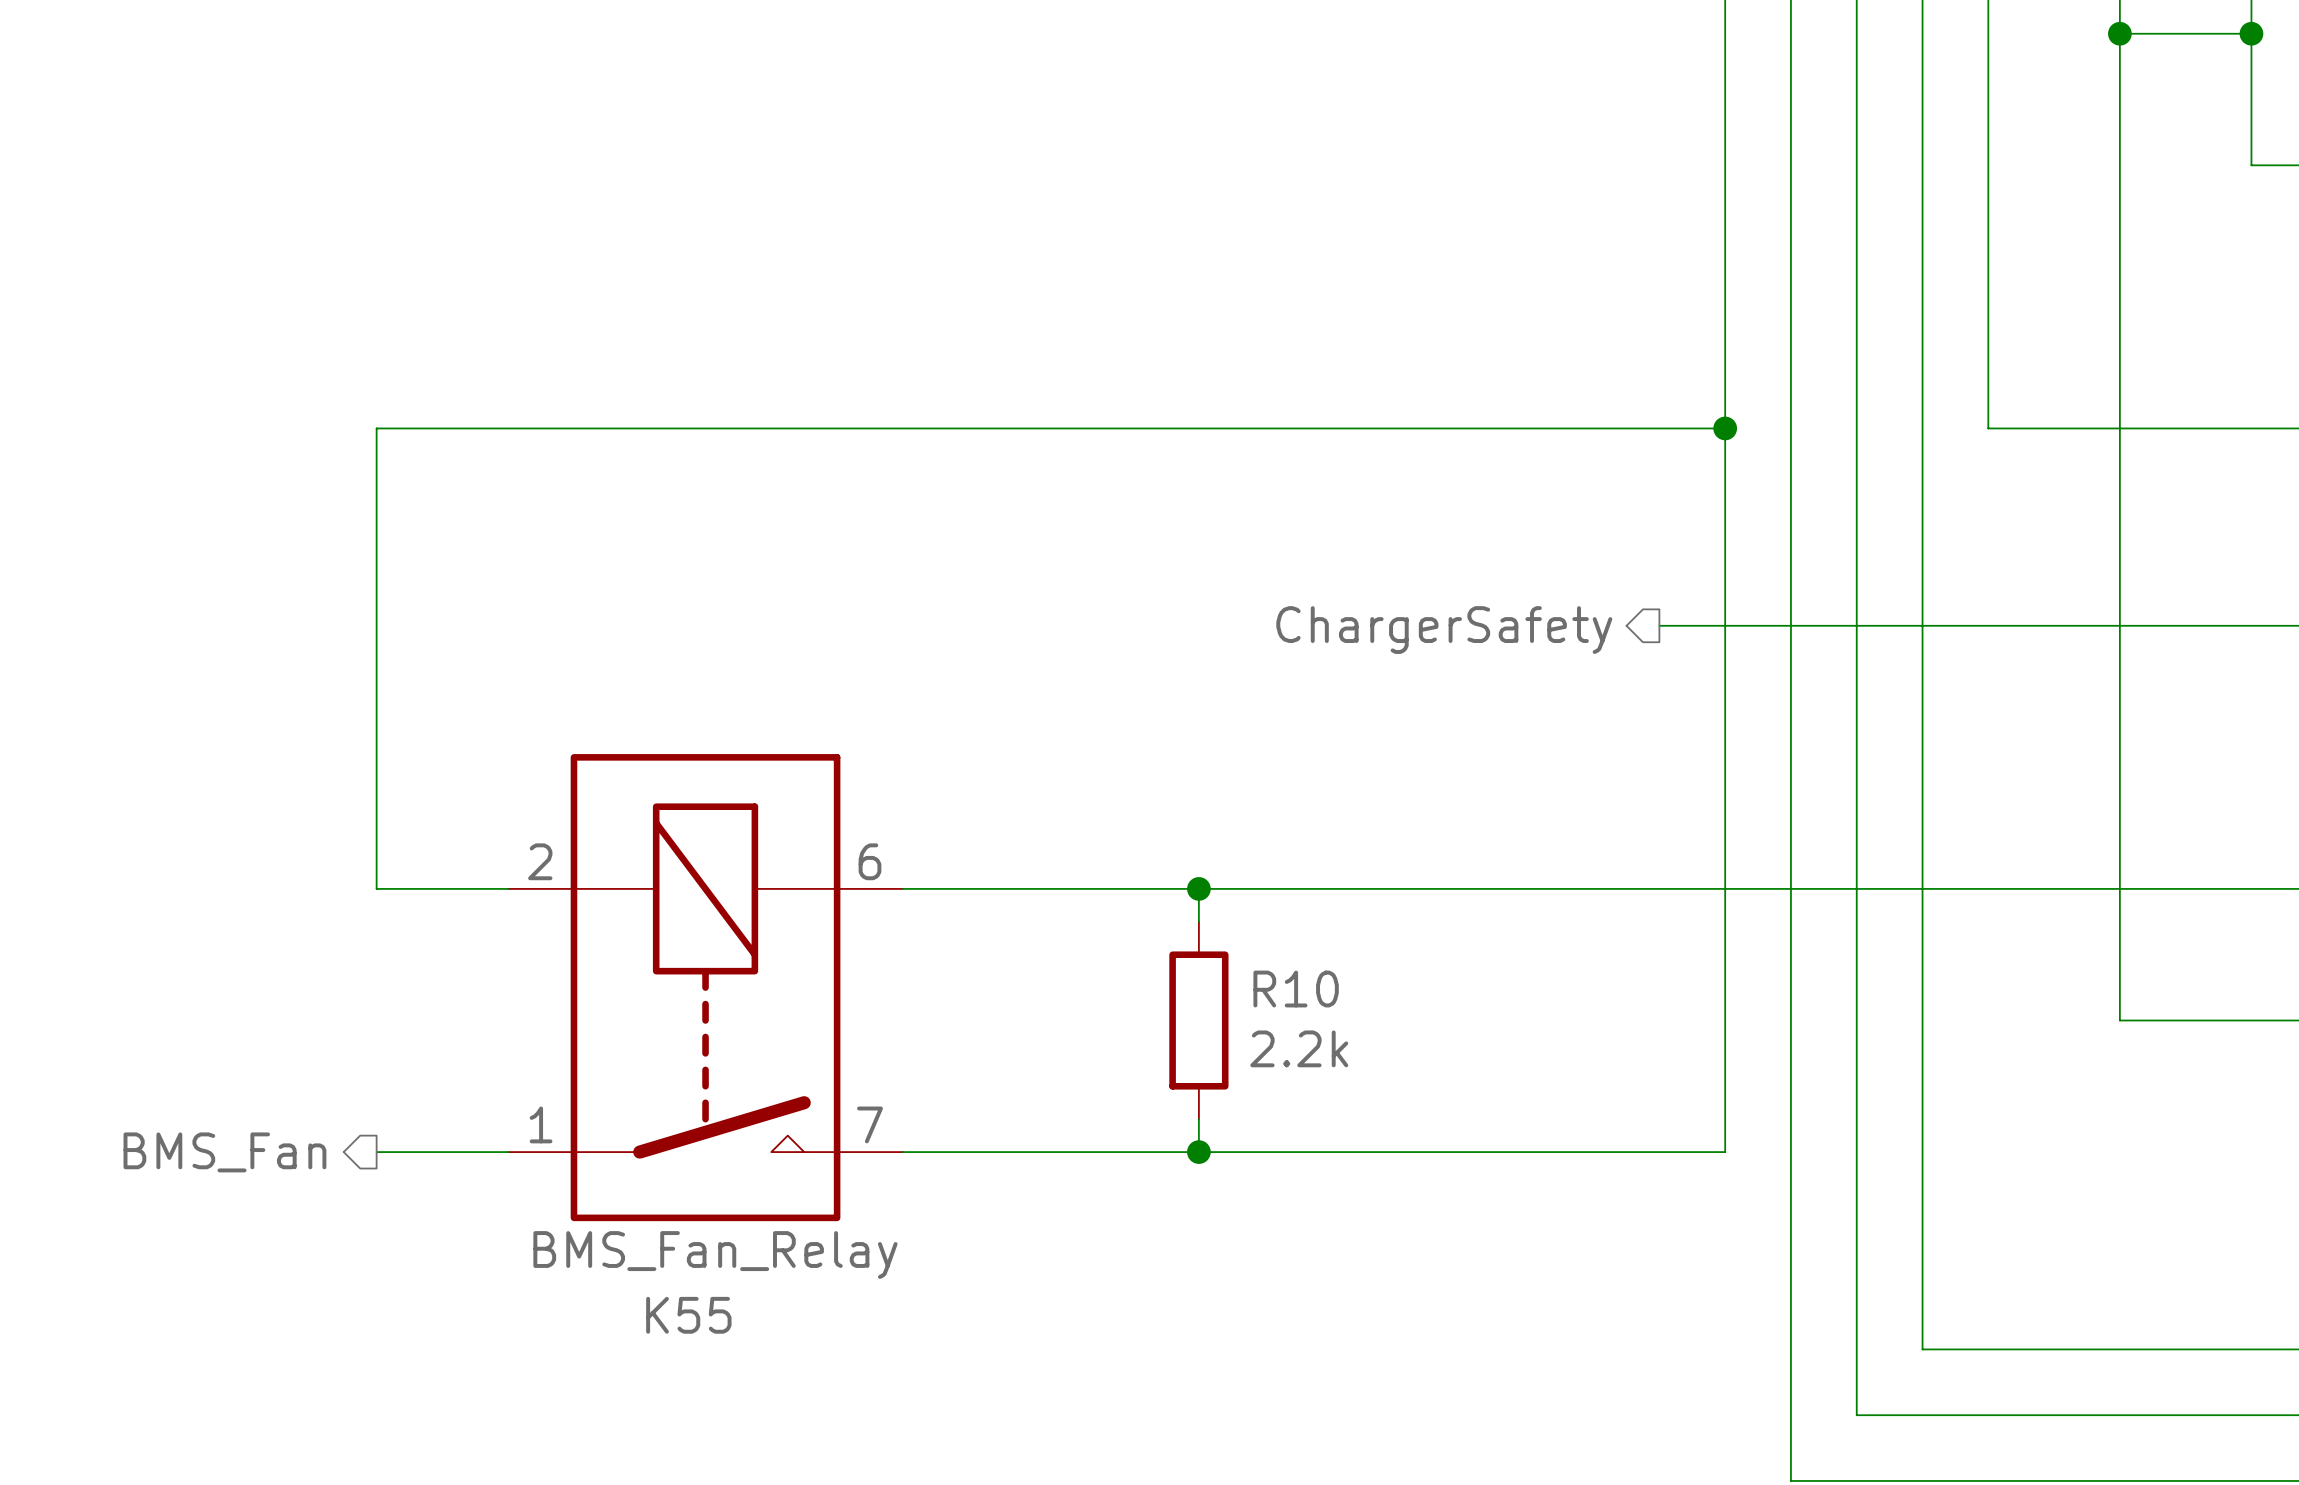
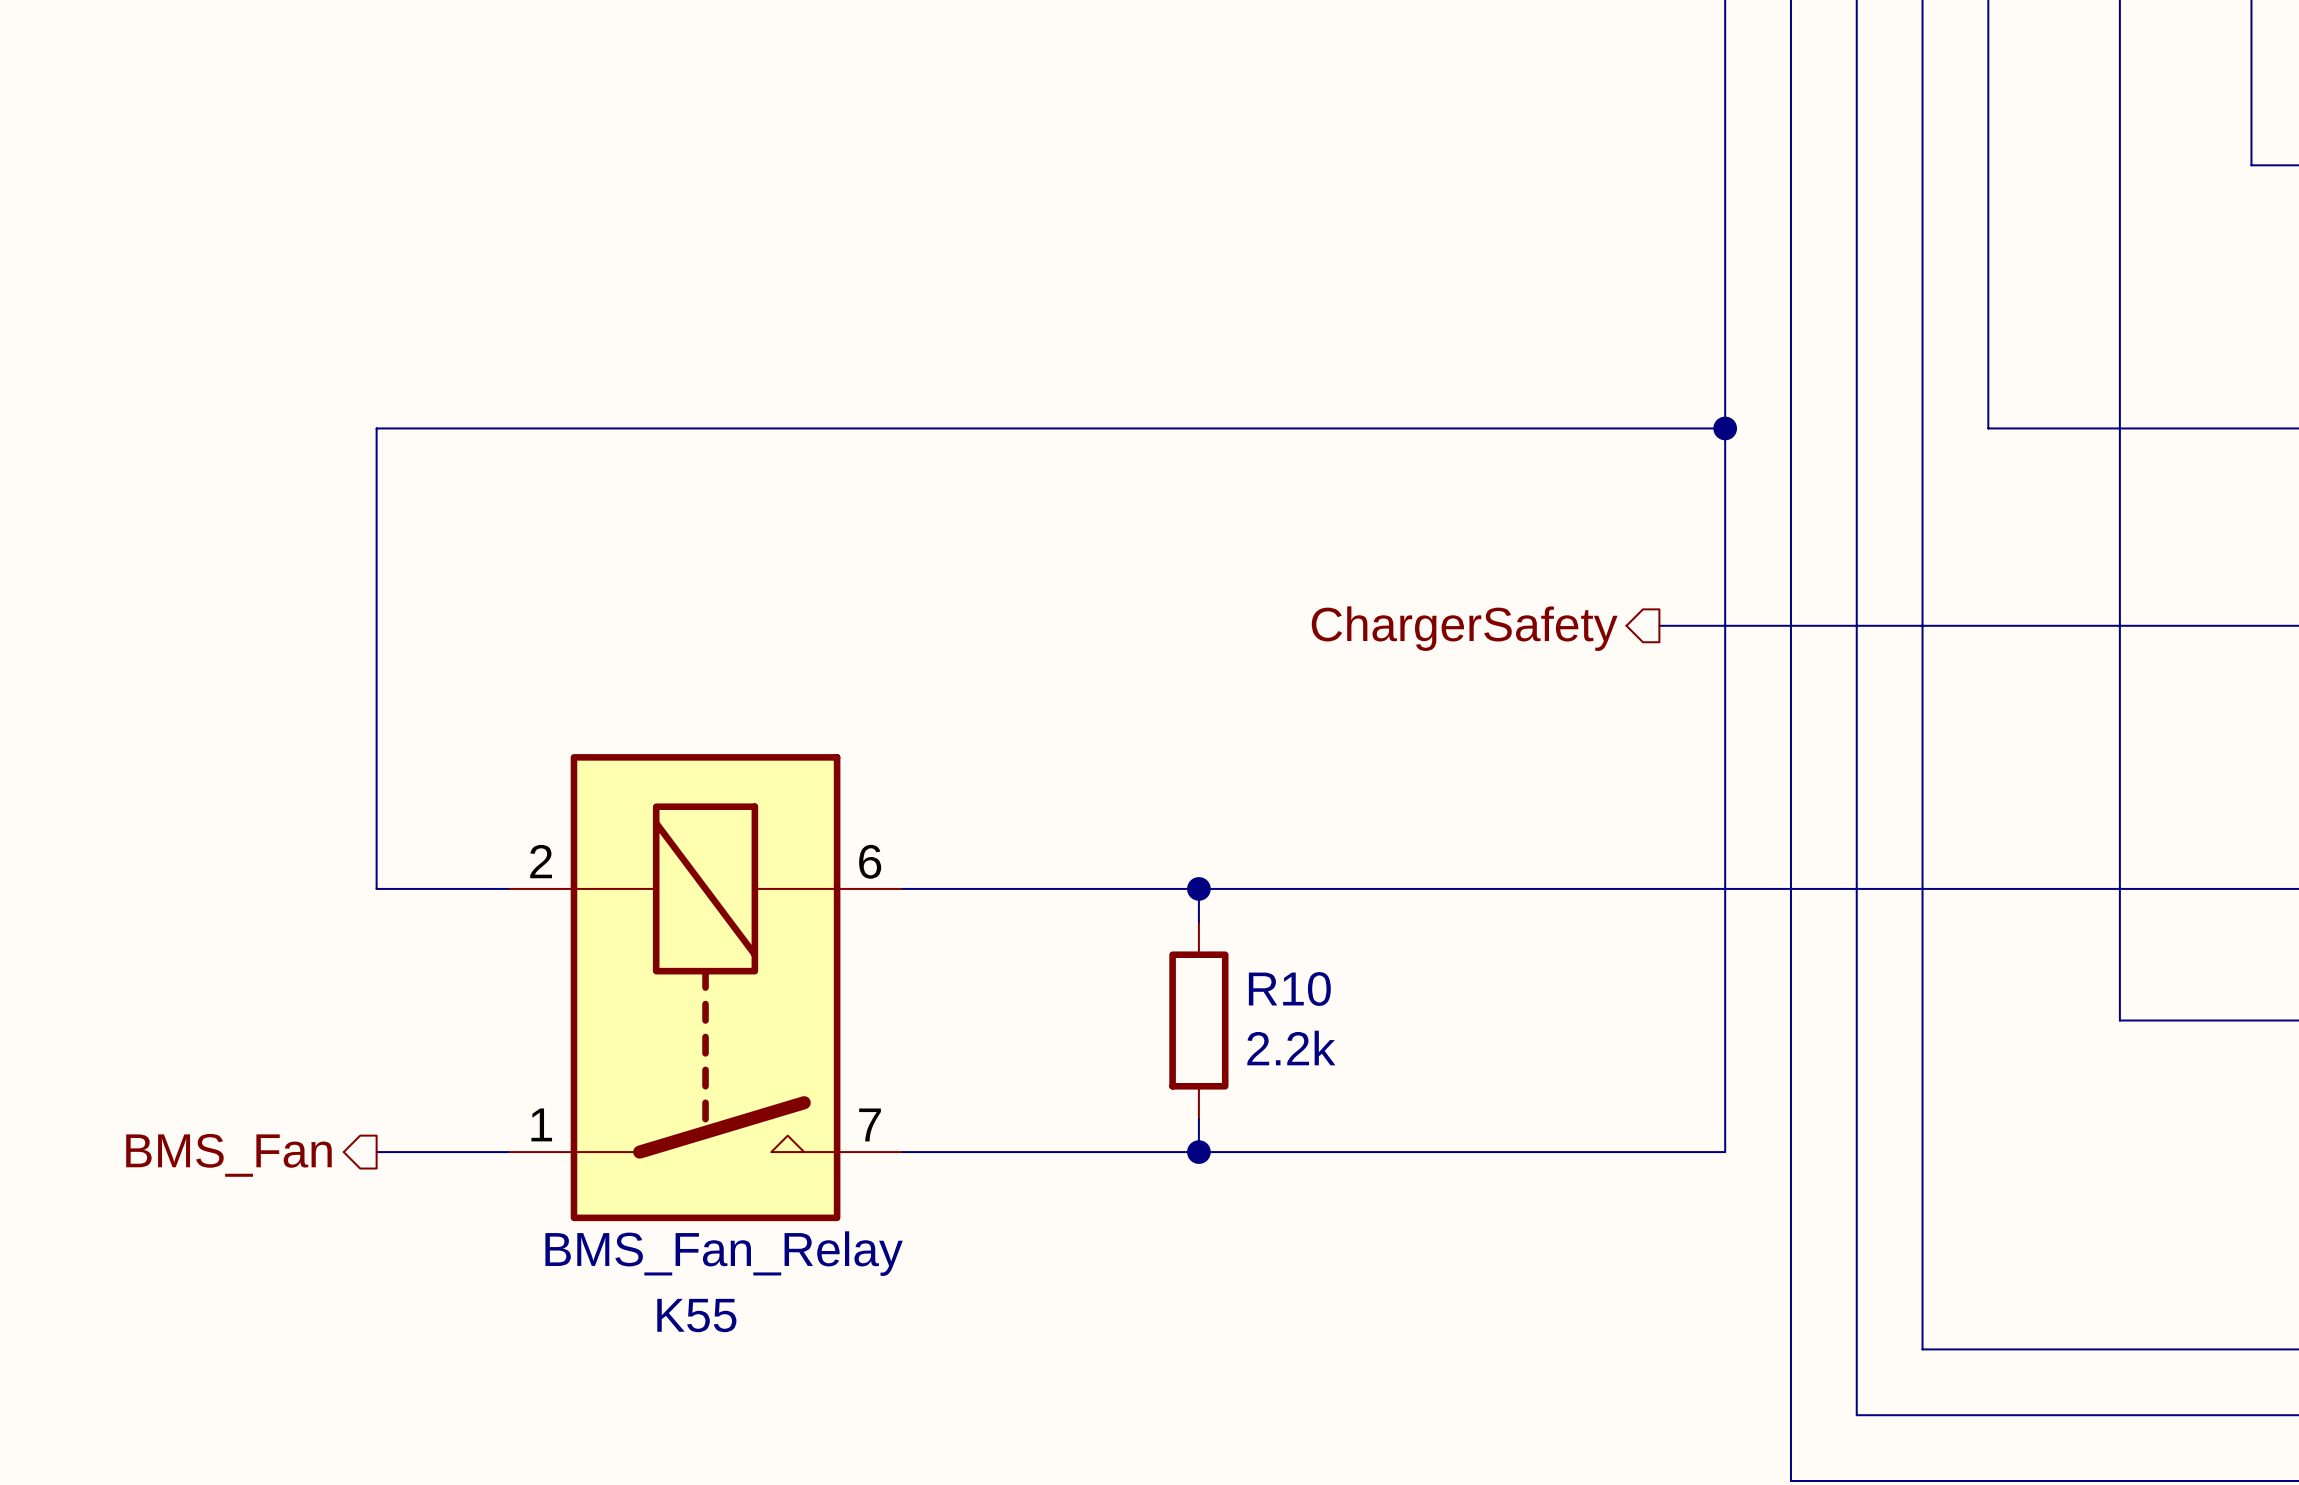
wire: (2119, 33) (2251, 33) -> none
junction: (2119, 33) -> none
junction: (2251, 33) -> none

